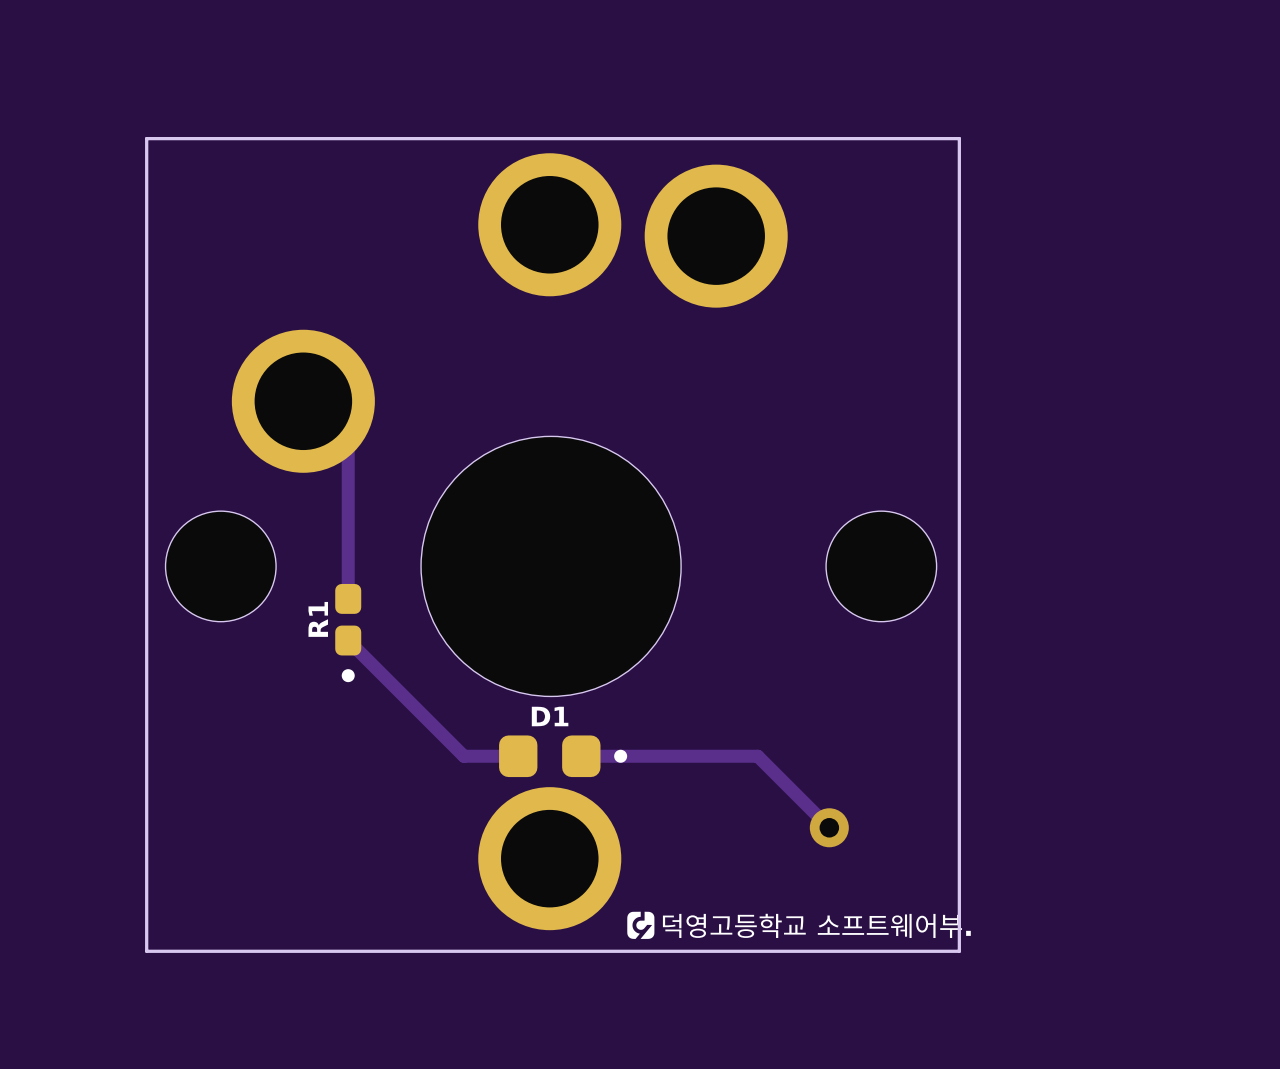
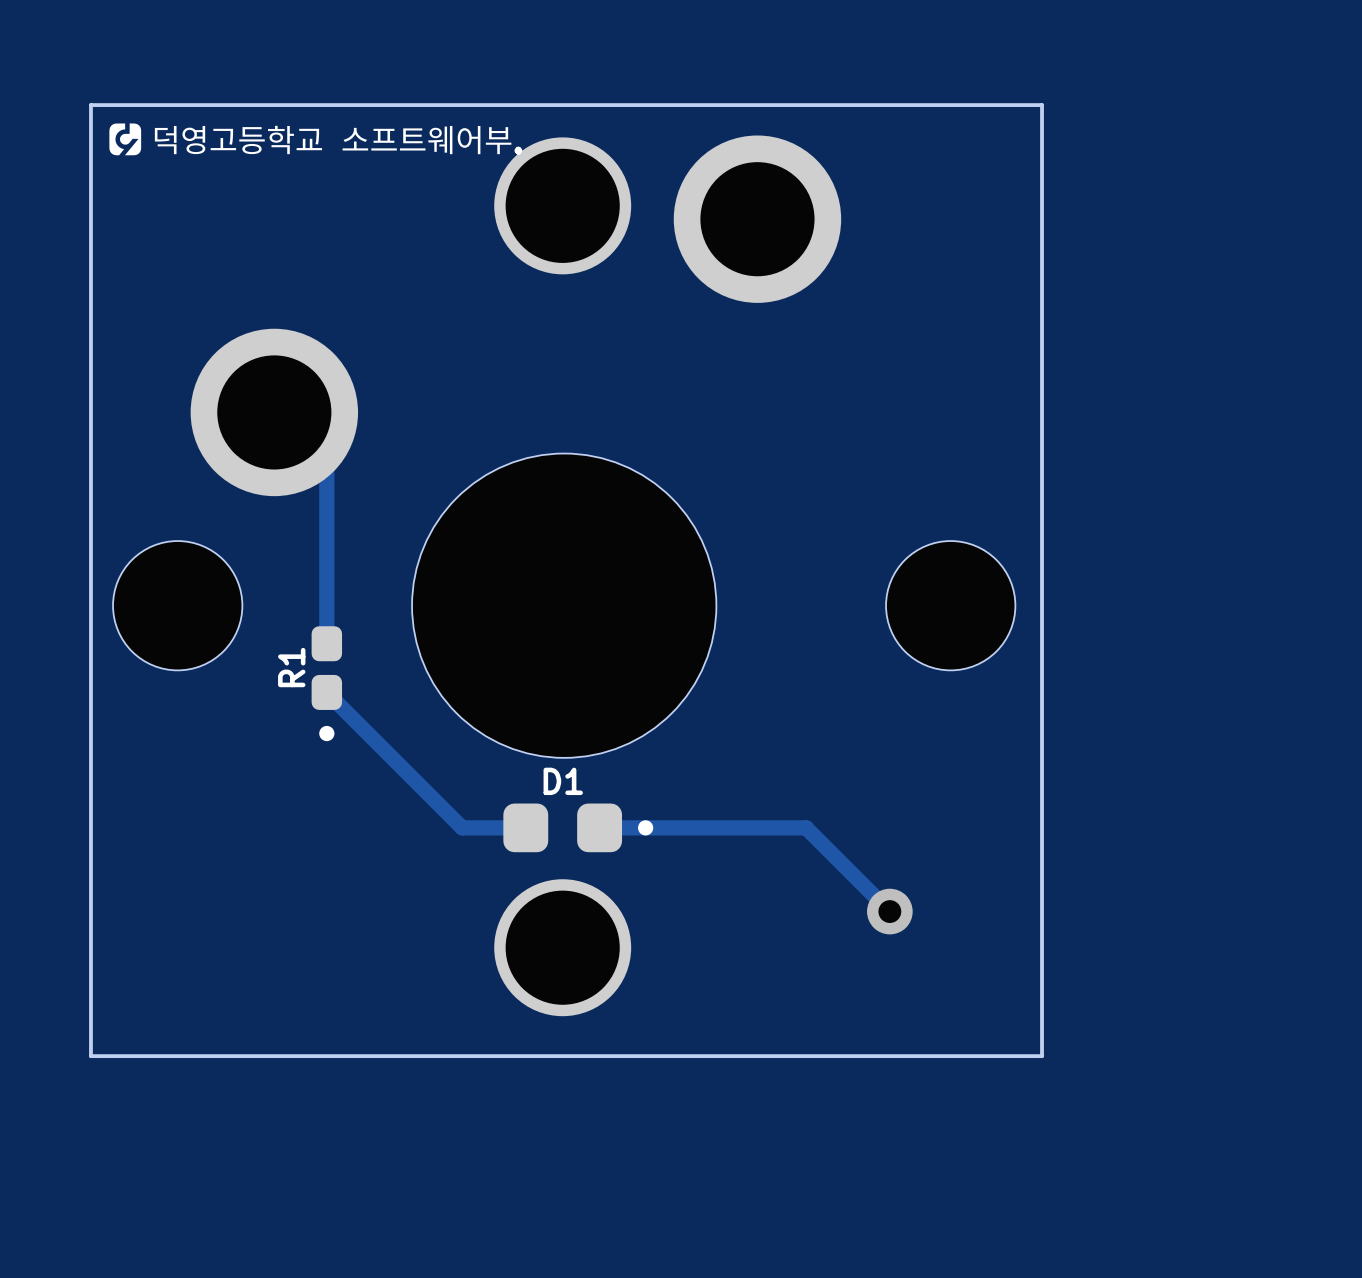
part footprint: [478, 153, 622, 297] -> [494, 137, 632, 275]
part footprint: [478, 787, 622, 931] -> [494, 879, 632, 1017]
drawing position: (640, 925) -> (125, 139)
text position: 덕영고등학교 소프트웨어부. (816, 925) -> 덕영고등학교 소프트웨어부. (337, 140)

